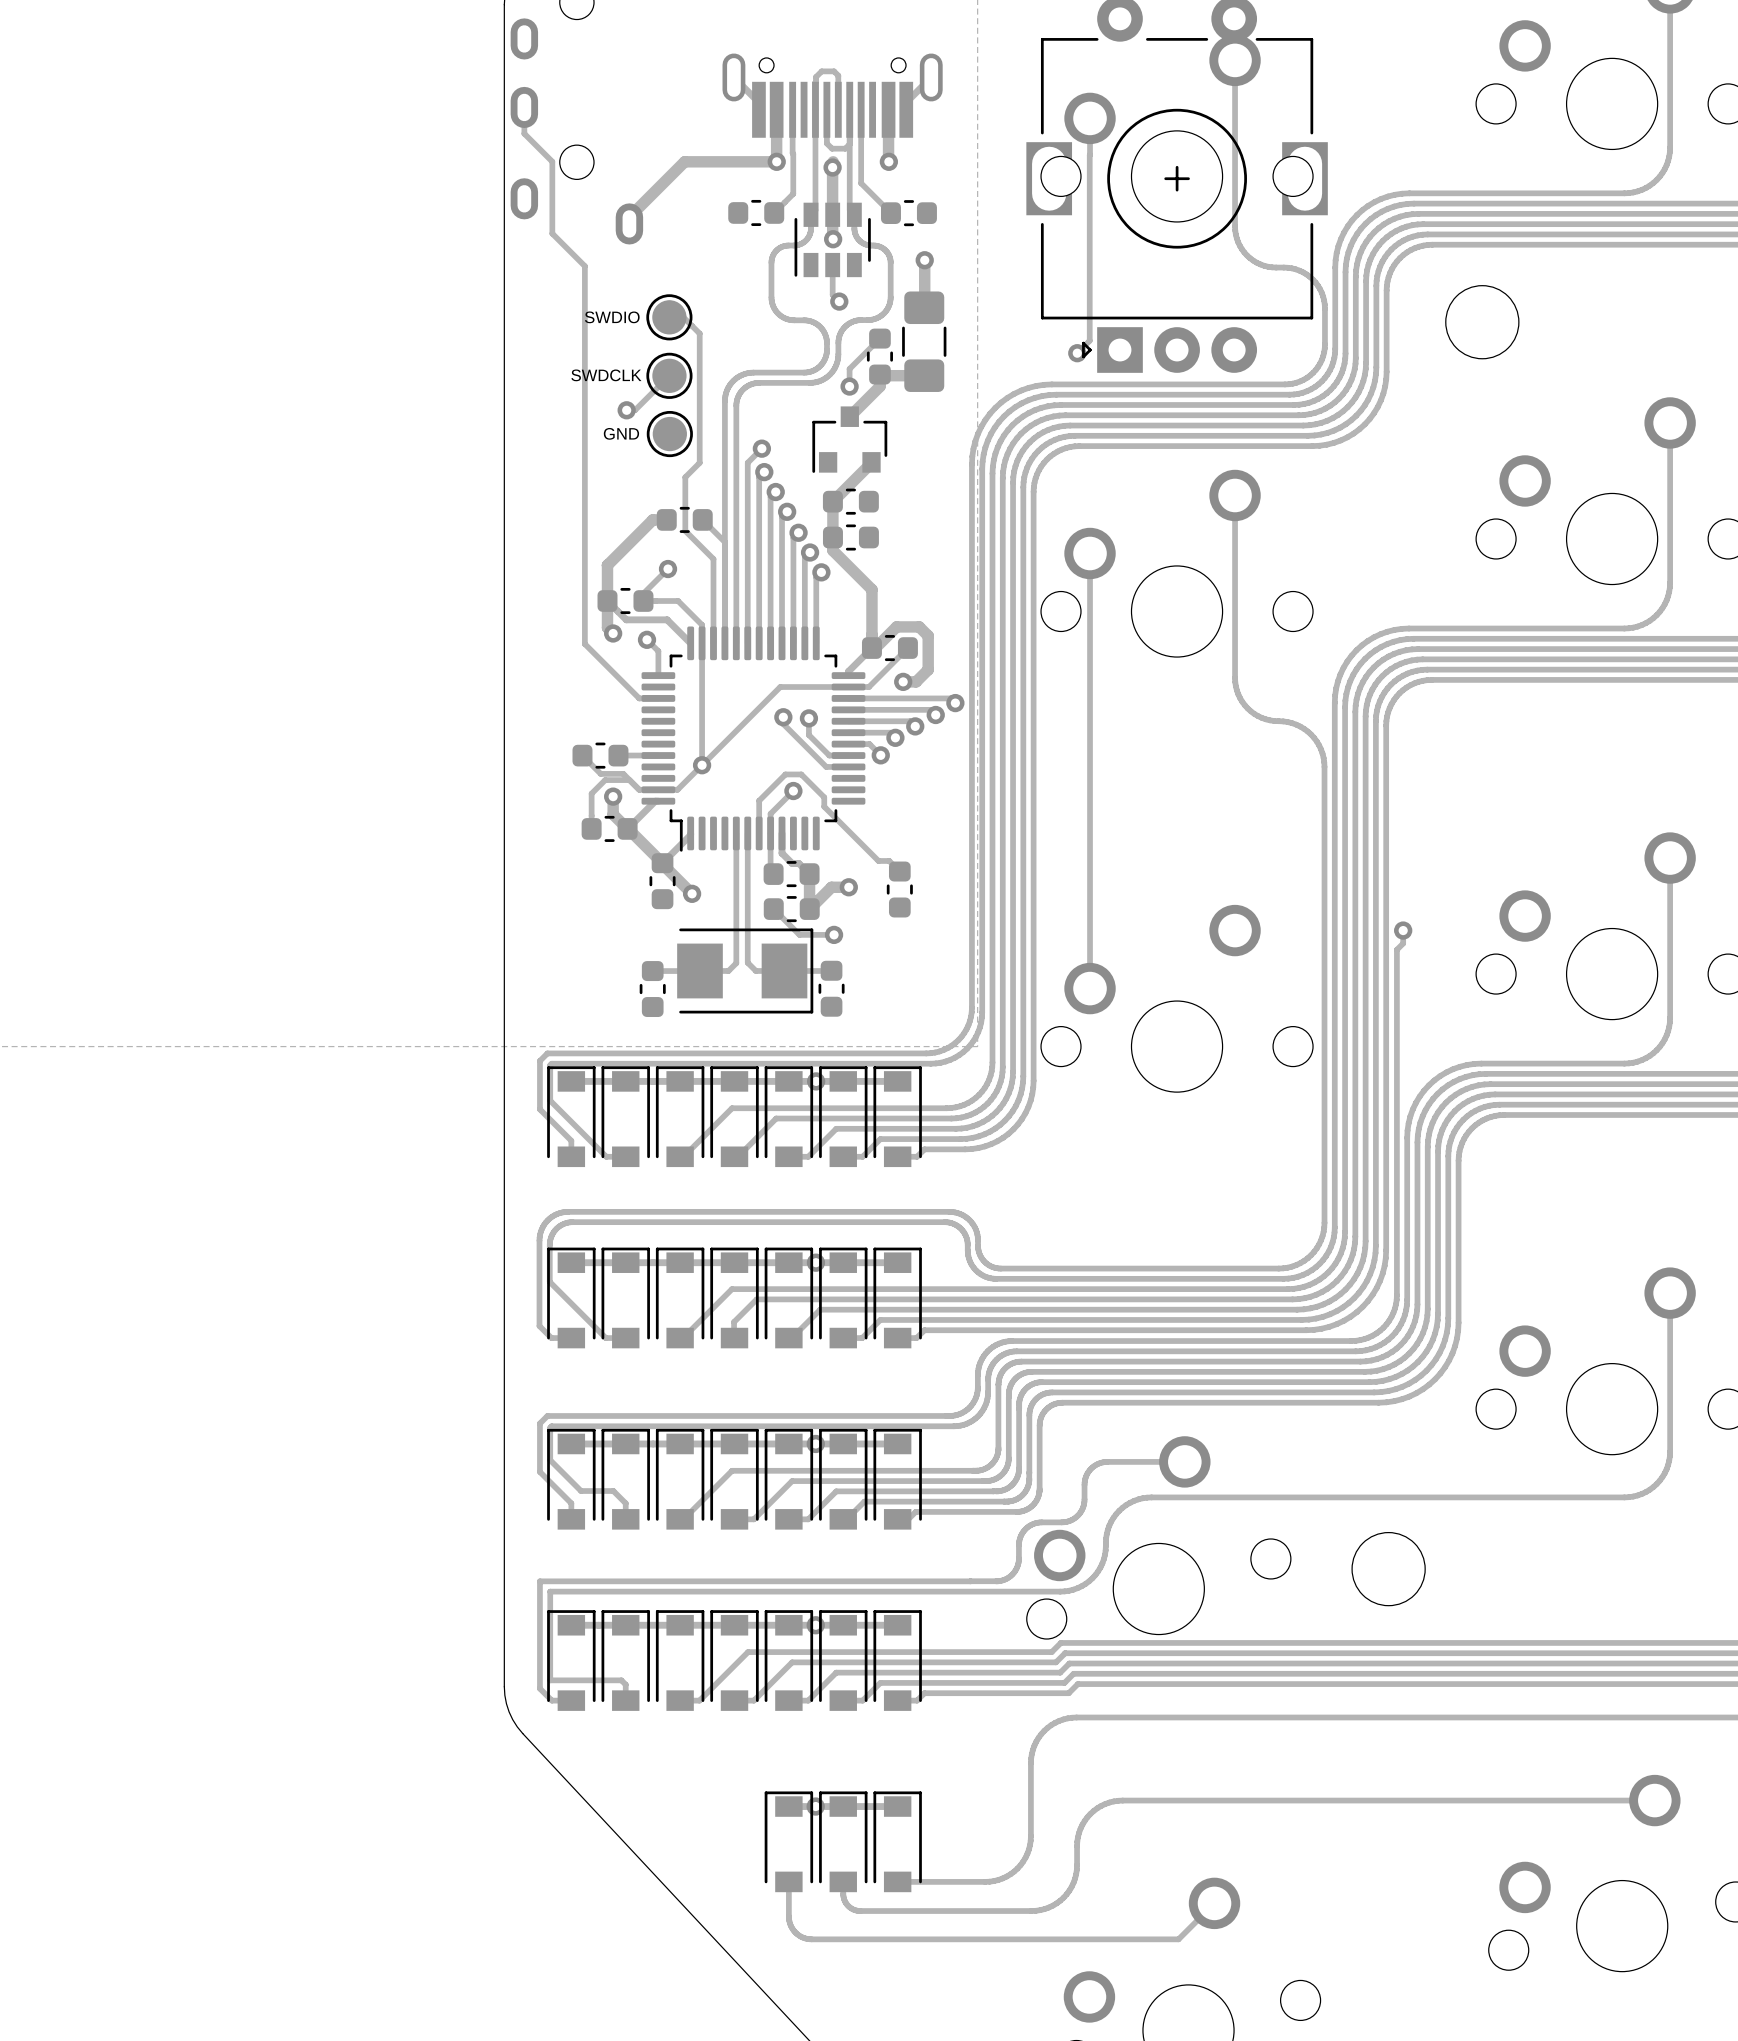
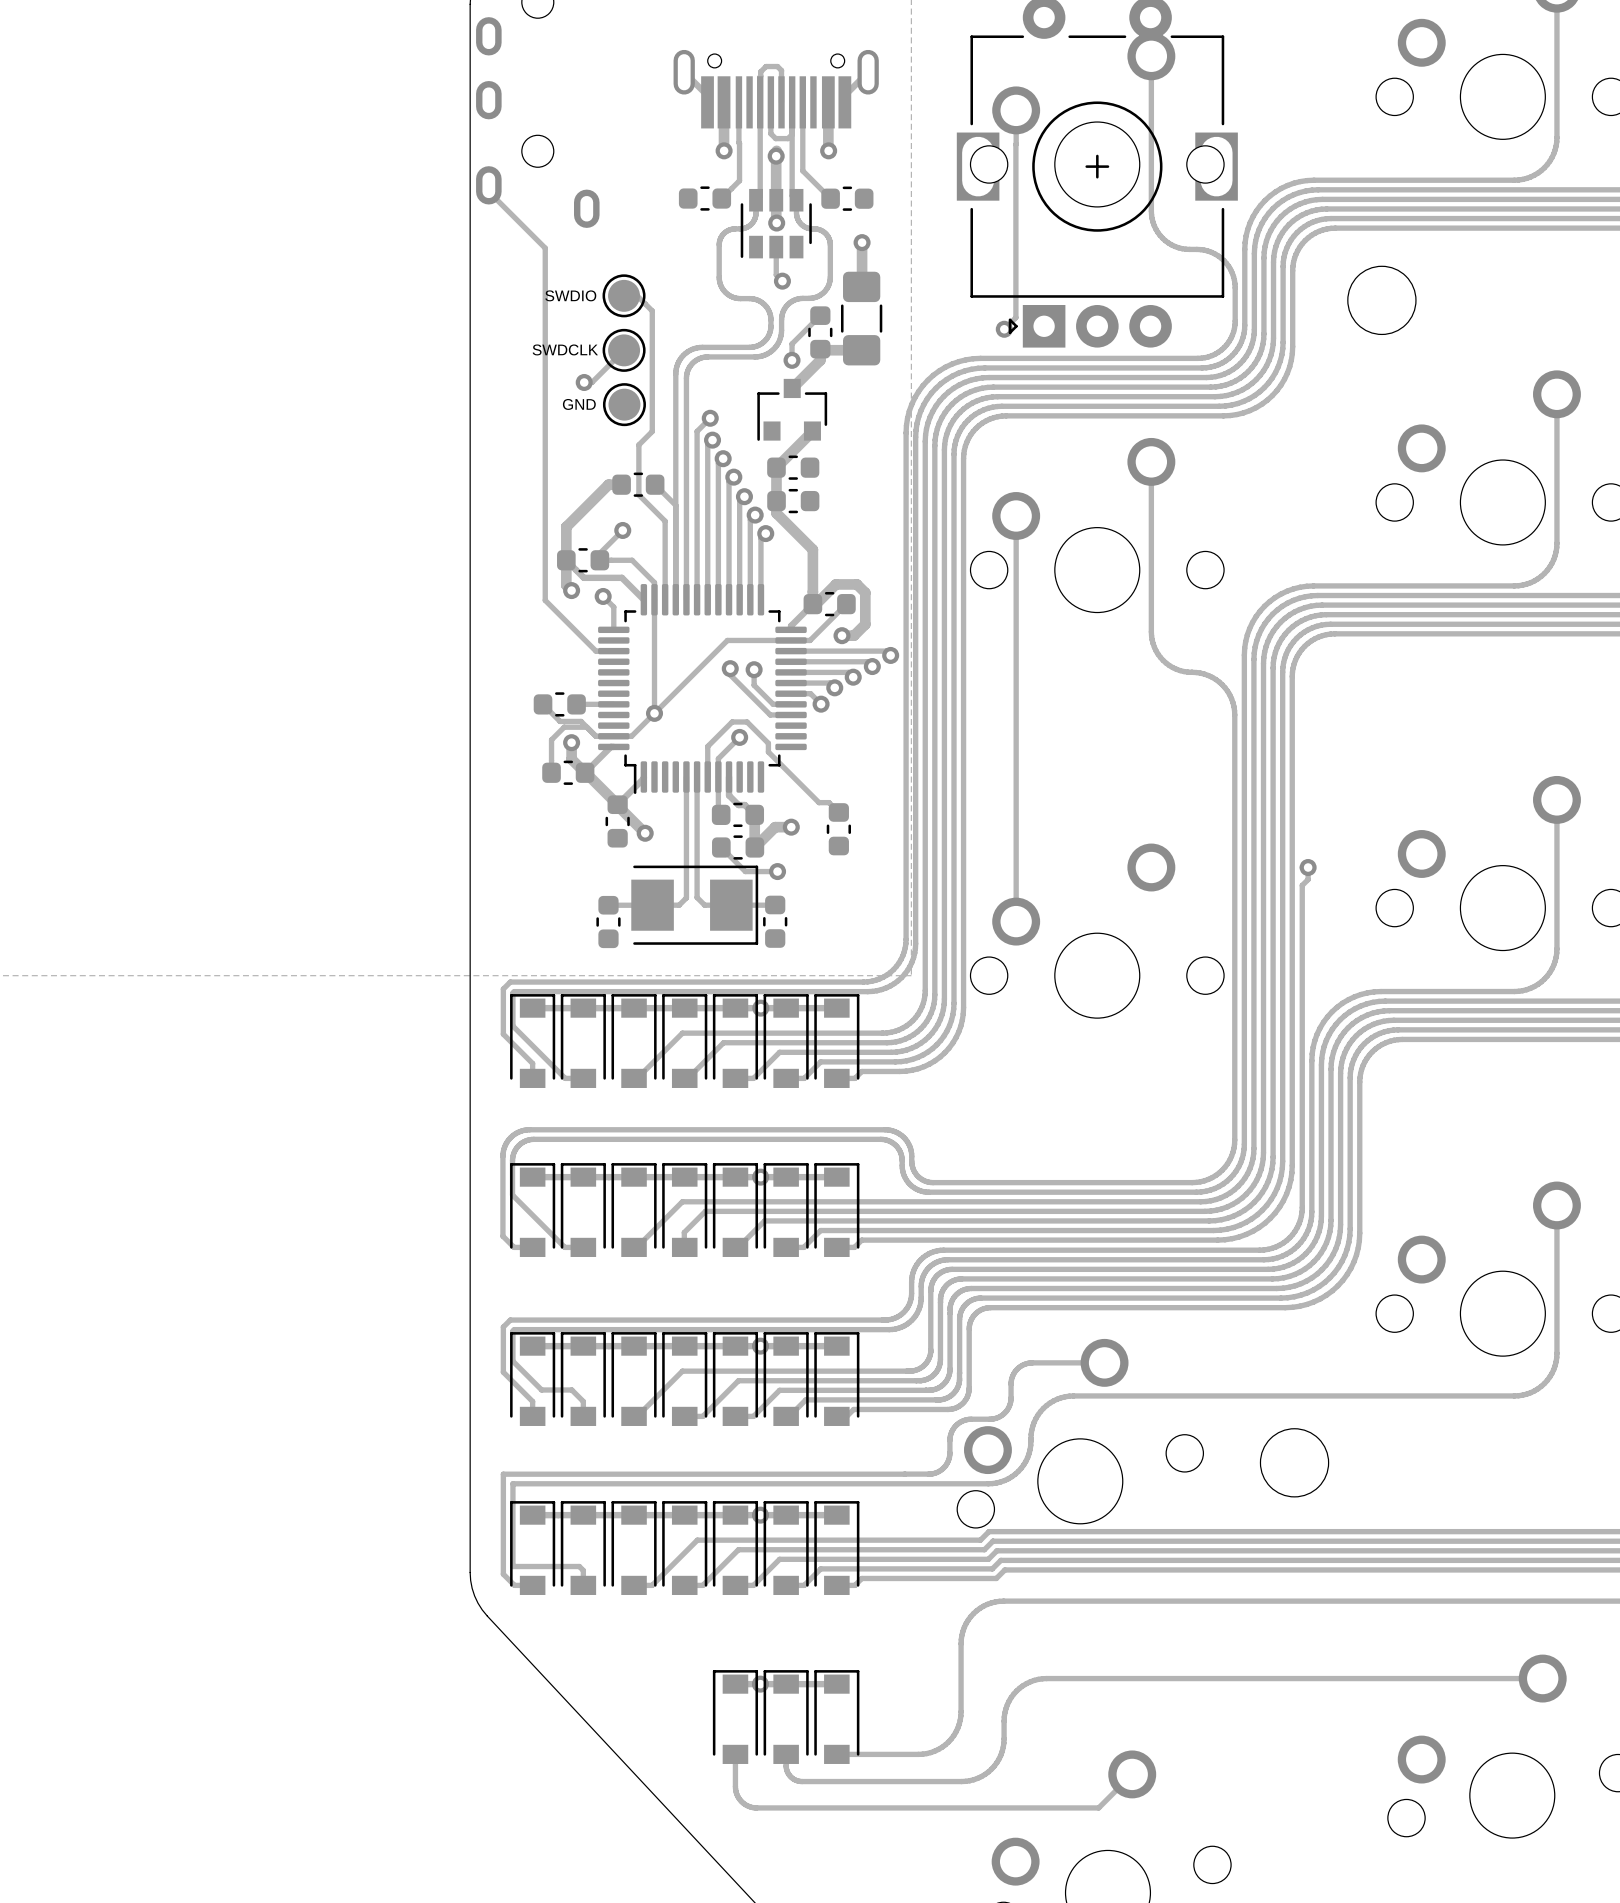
track: (524, 107) (524, 133) (552, 161) (552, 233) -> (488, 191) (514, 217)
track: (776, 161) (684, 161) (629, 217) (629, 223) -> none

